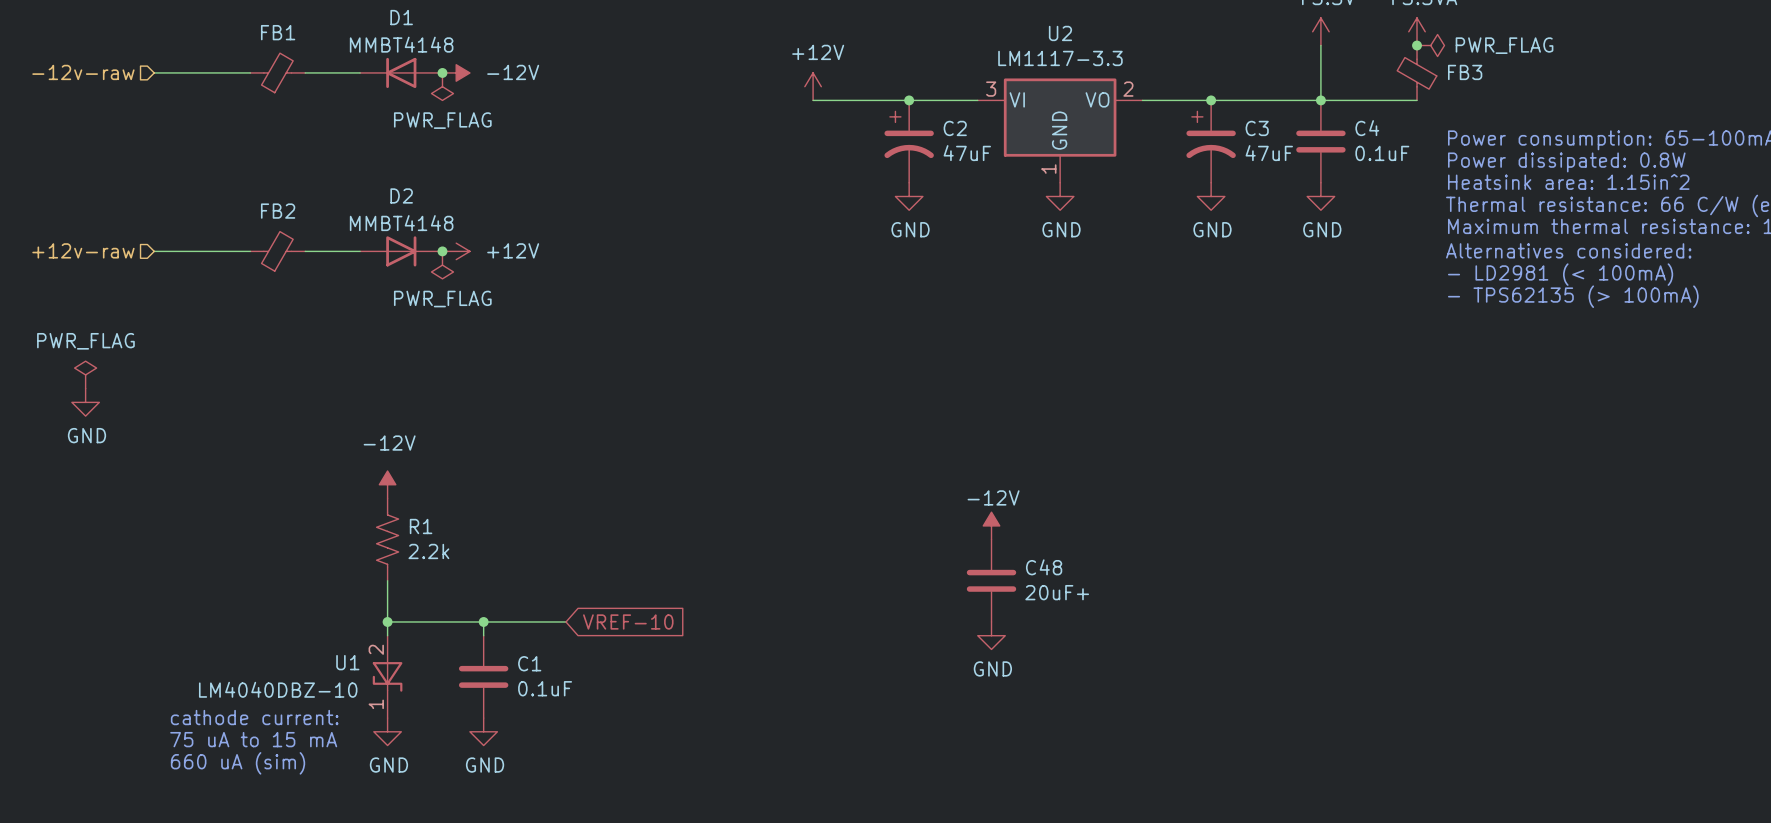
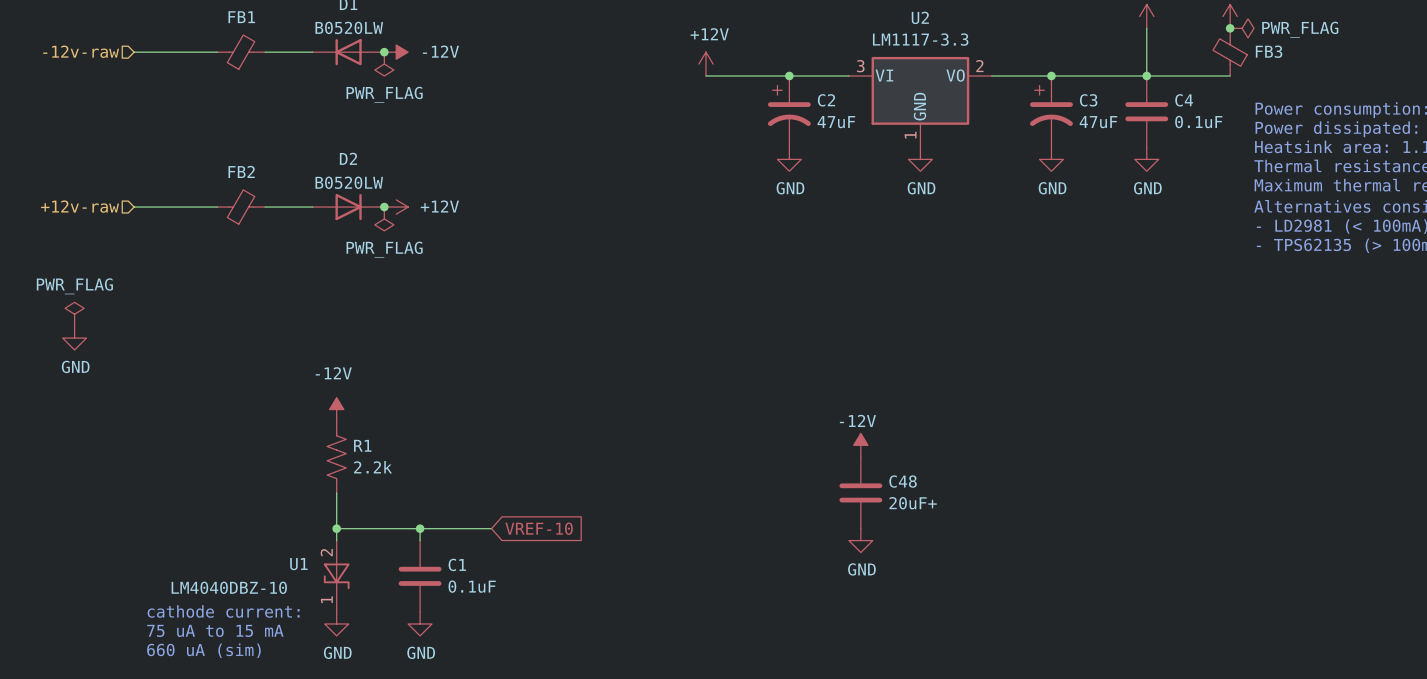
D1 value: MMBT4148 (401, 44) -> B0520LW (349, 27)
D2 value: MMBT4148 (401, 223) -> B0520LW (349, 182)

